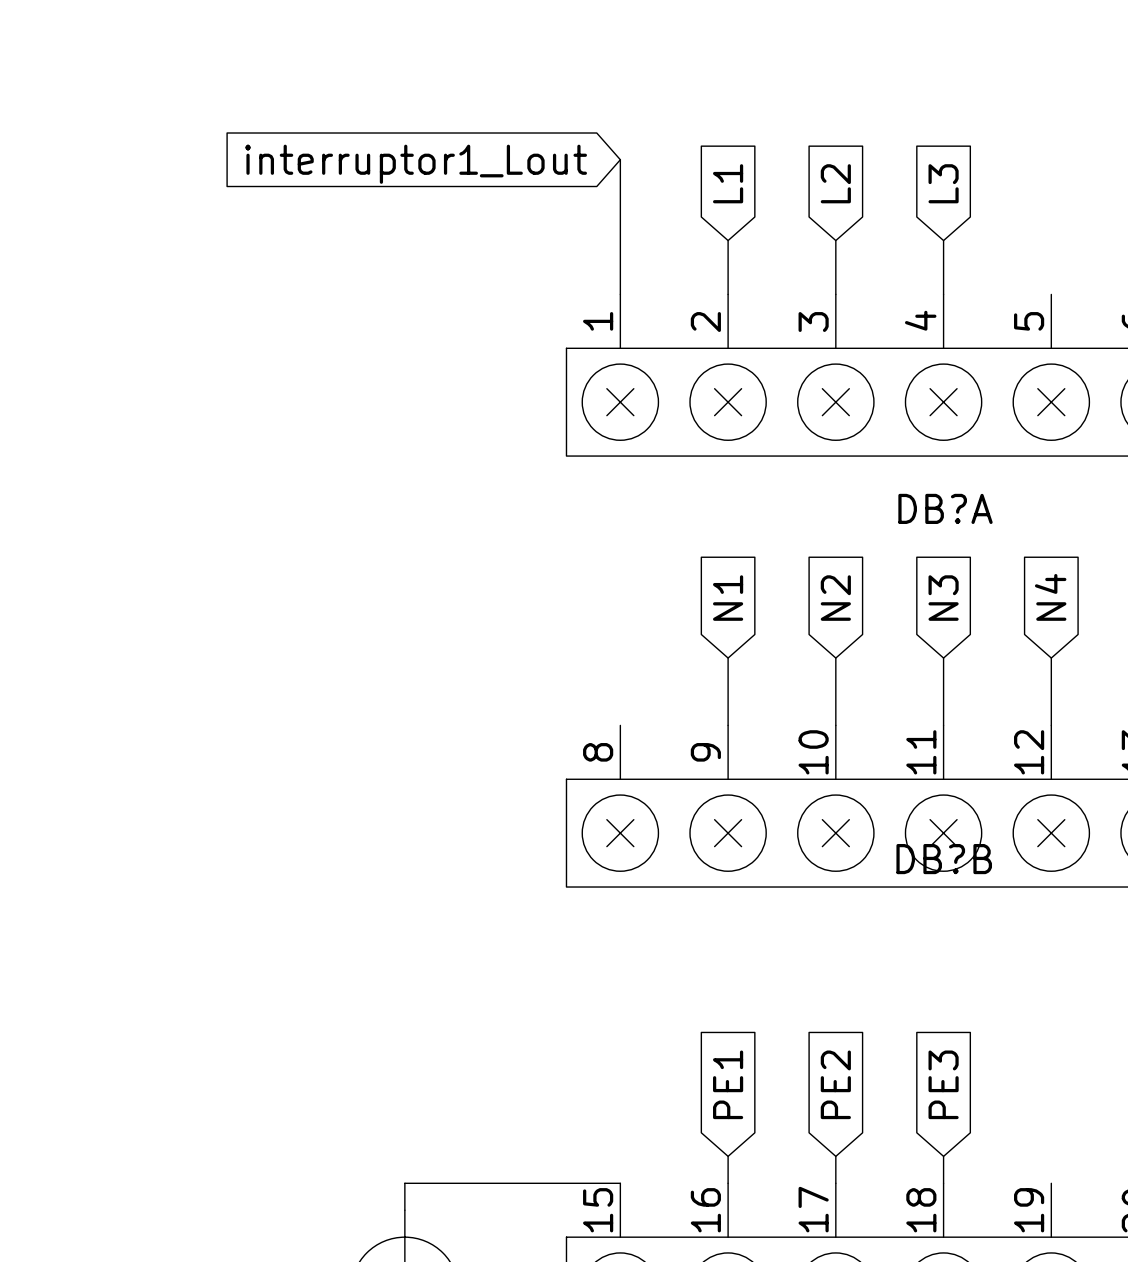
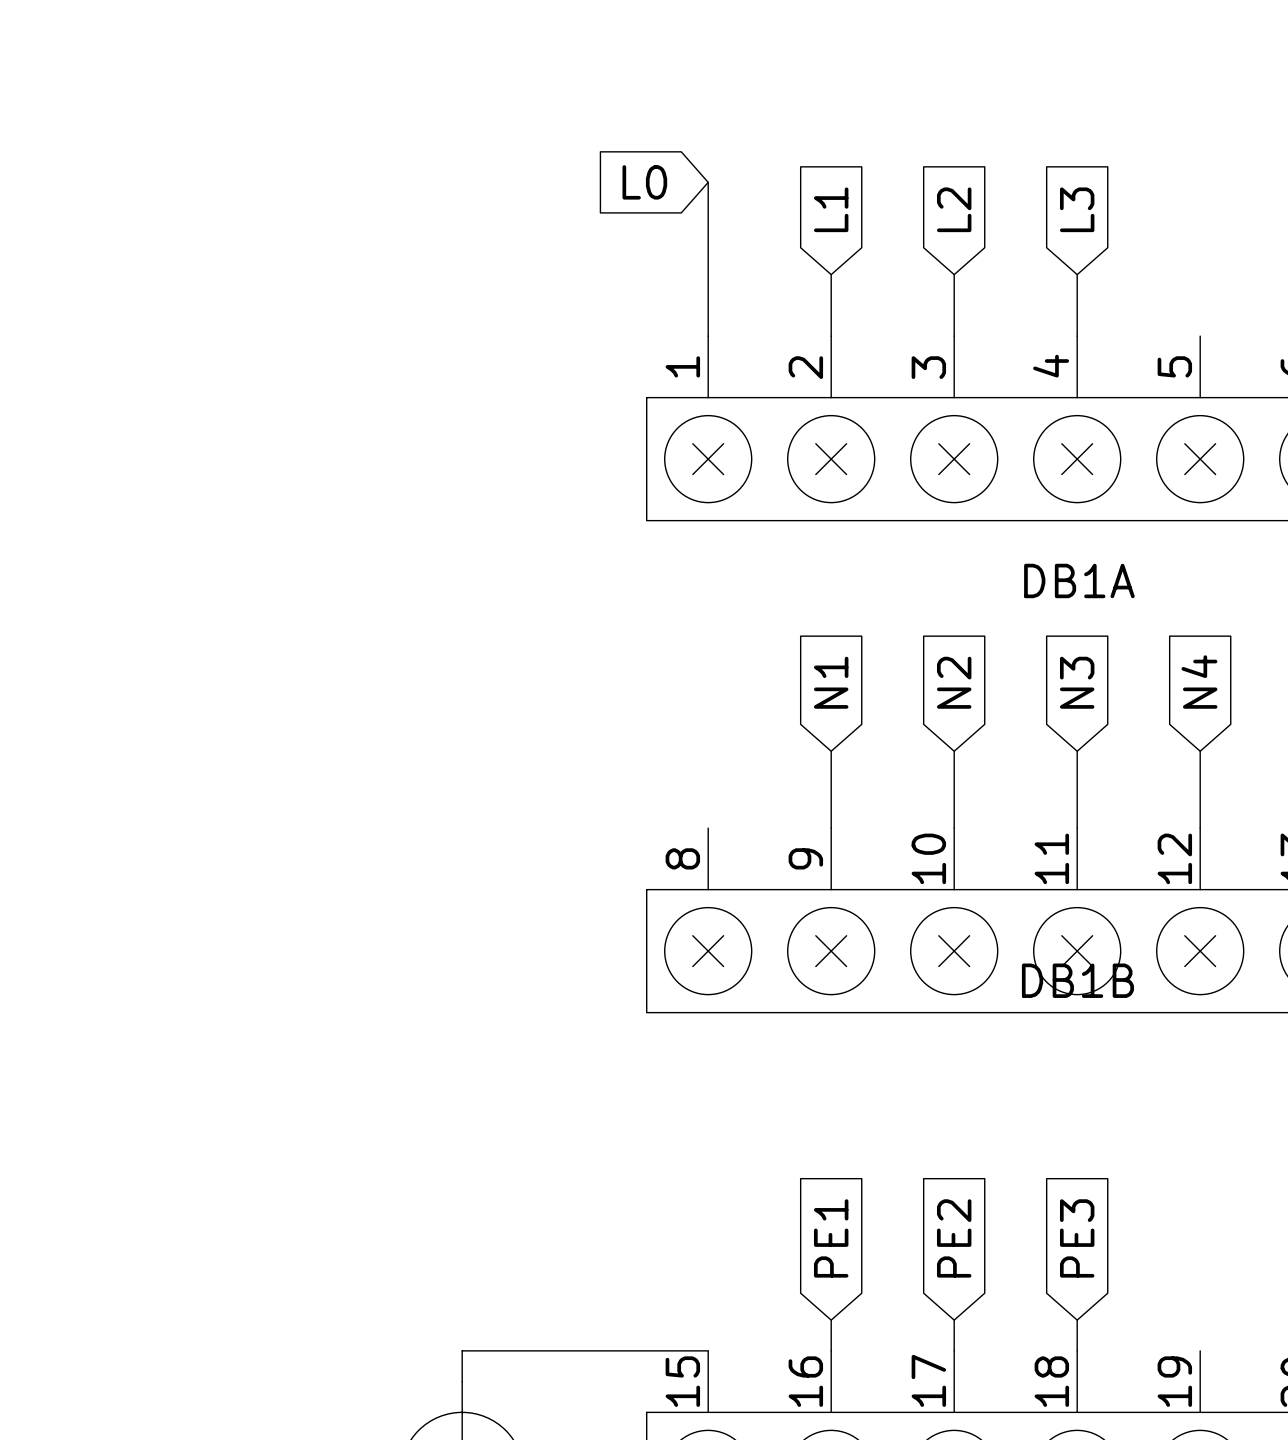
global label: interruptor1_Lout (416, 164) -> L0 (644, 182)
DB?A name: DB?A (945, 508) -> DB1A (1079, 580)
DB?B name: DB?B (944, 859) -> DB1B (1077, 980)

